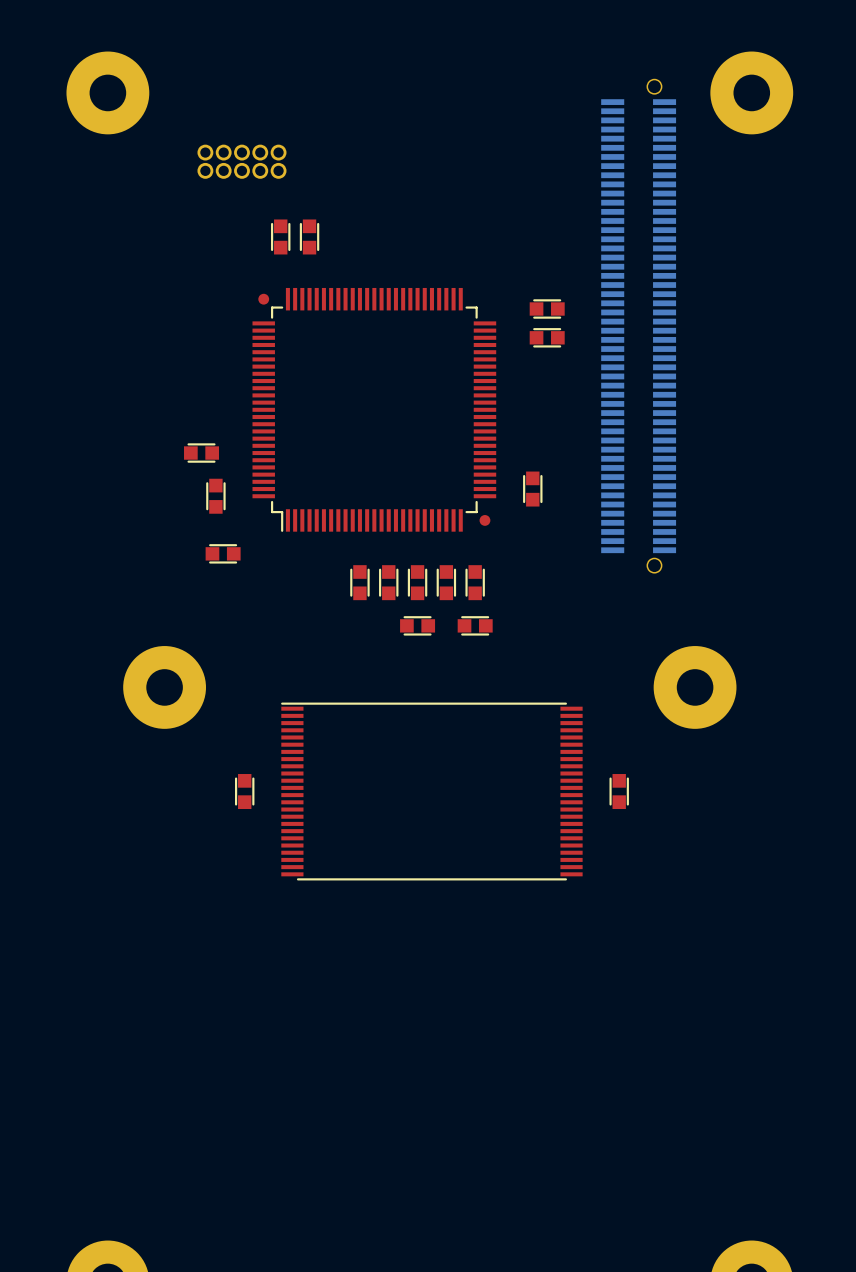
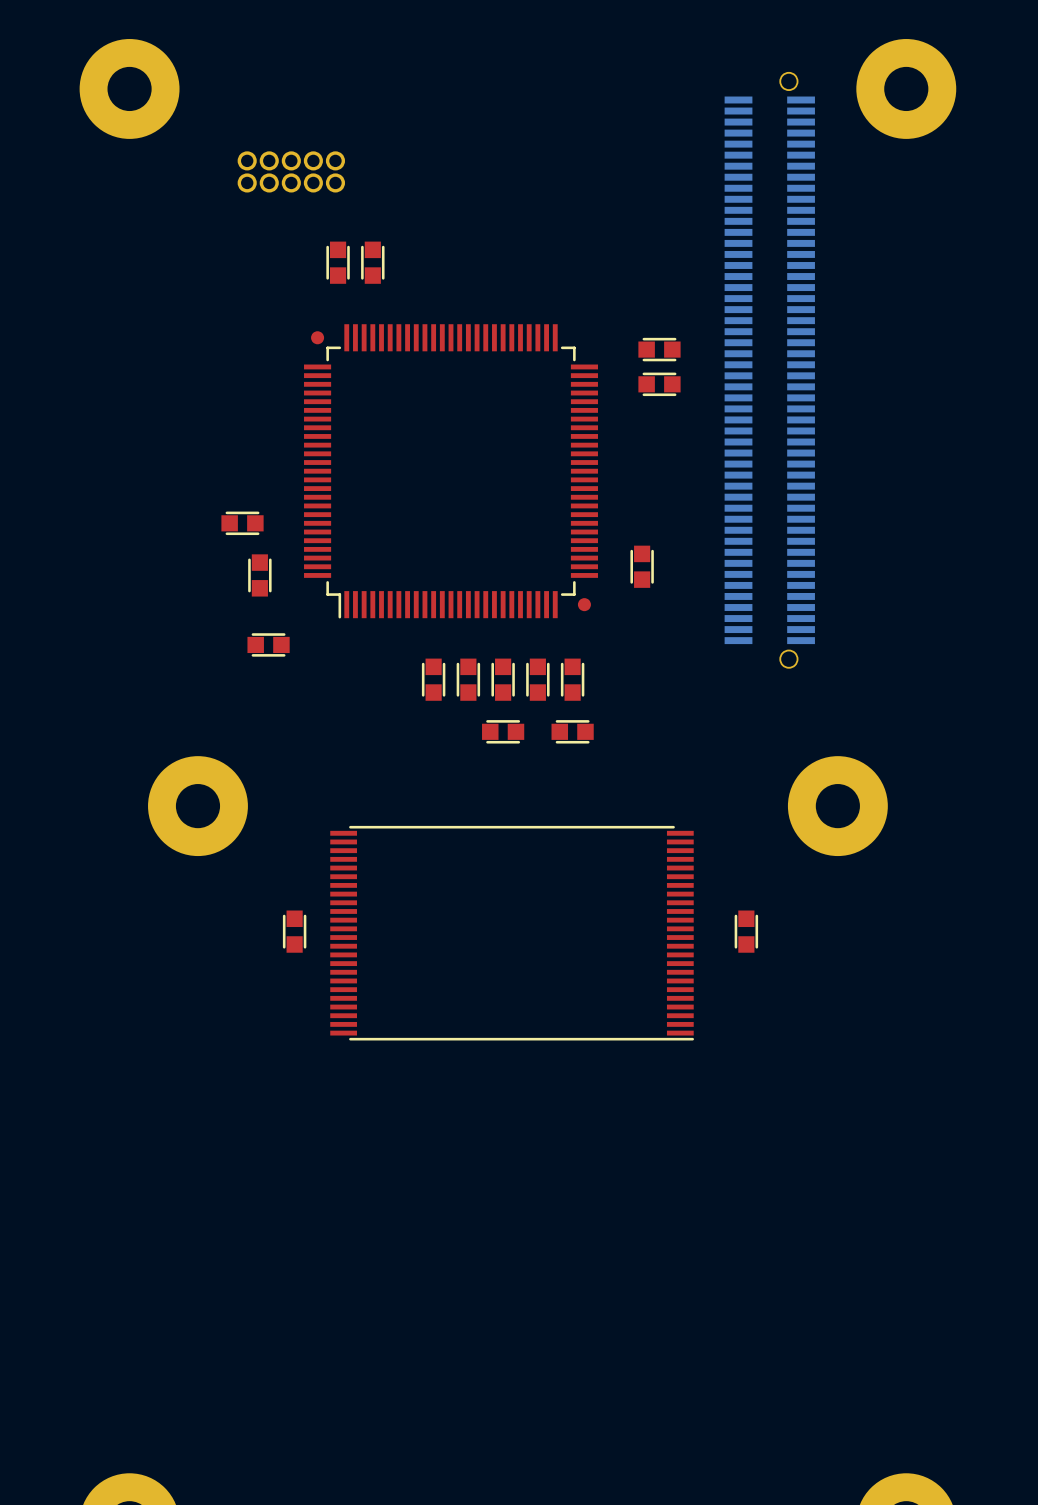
part rotation: 0° (431, 791) -> 180° (512, 933)

